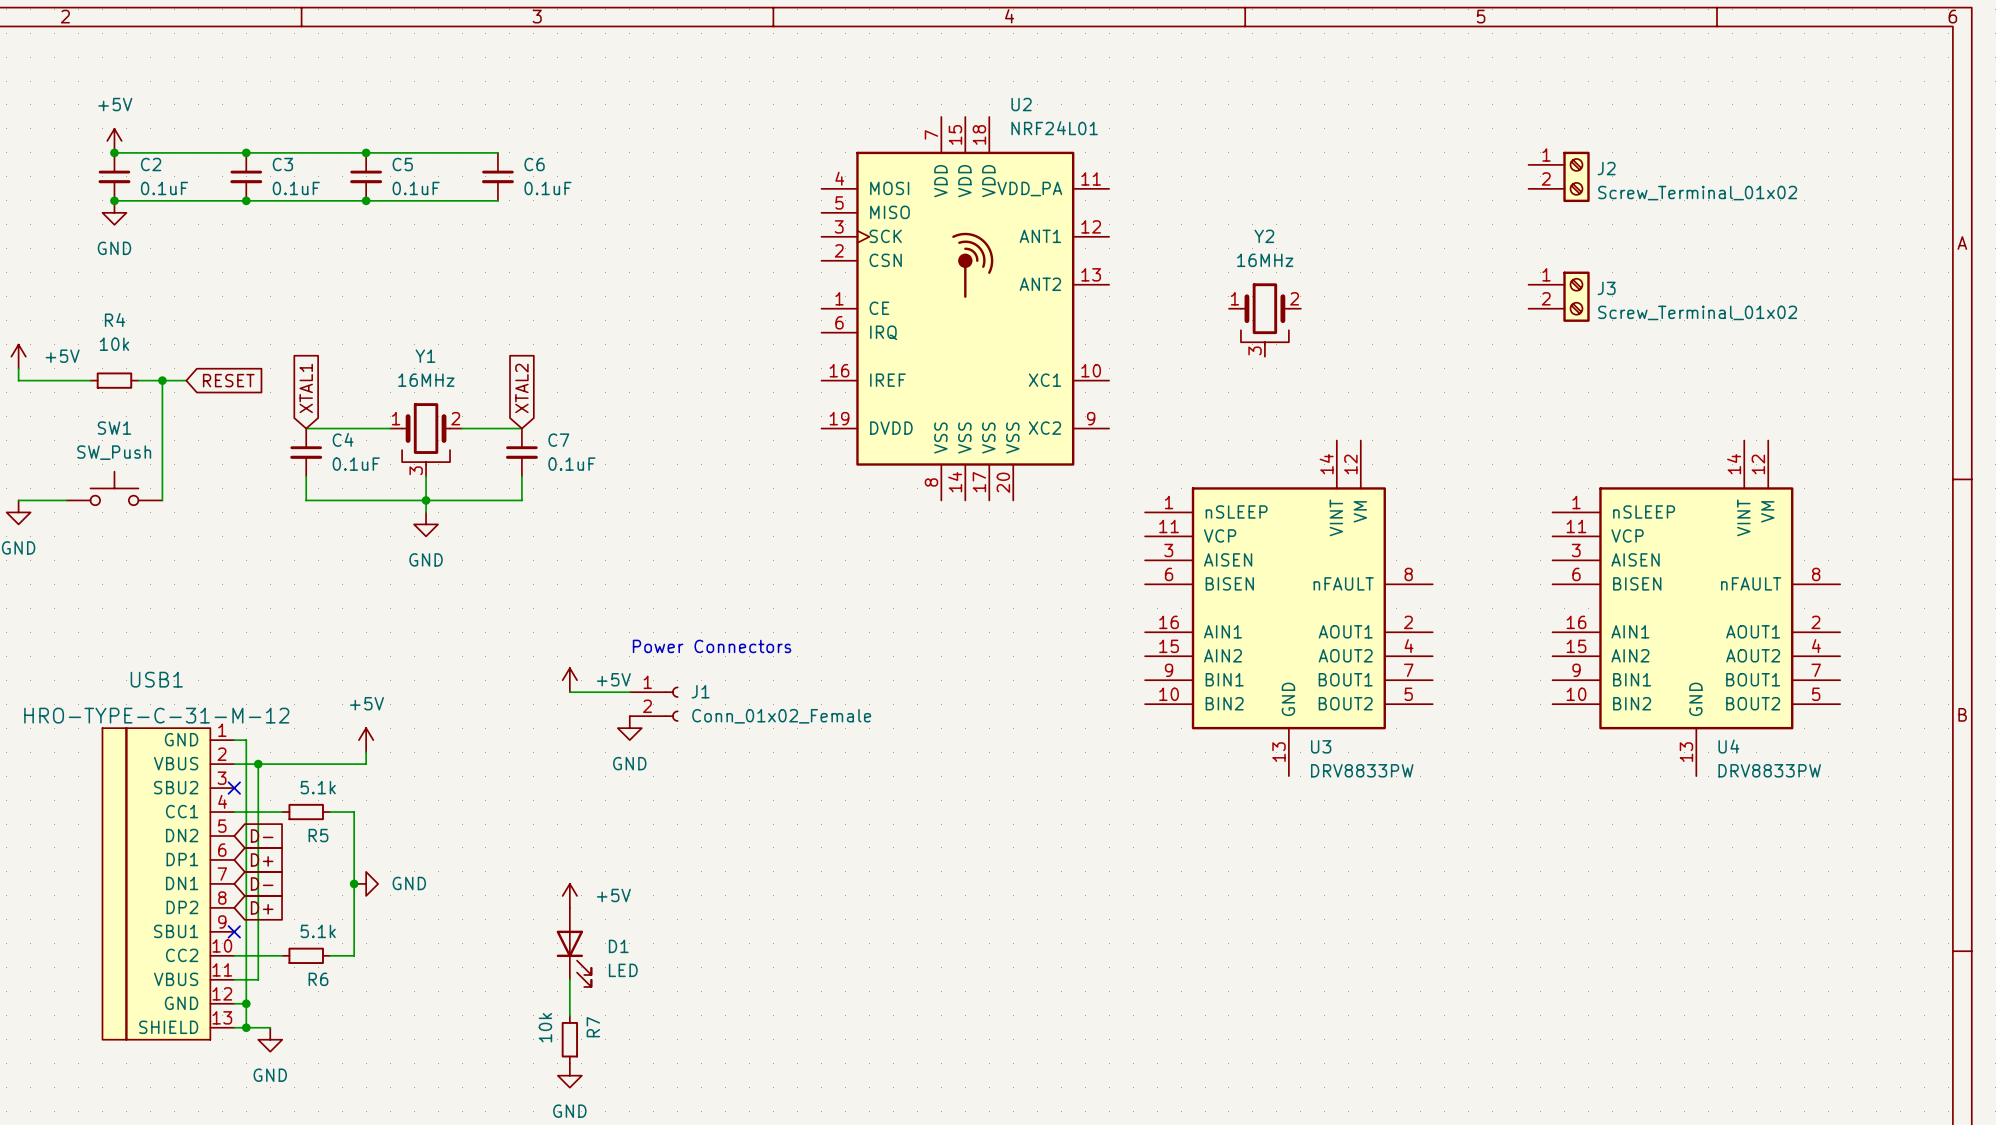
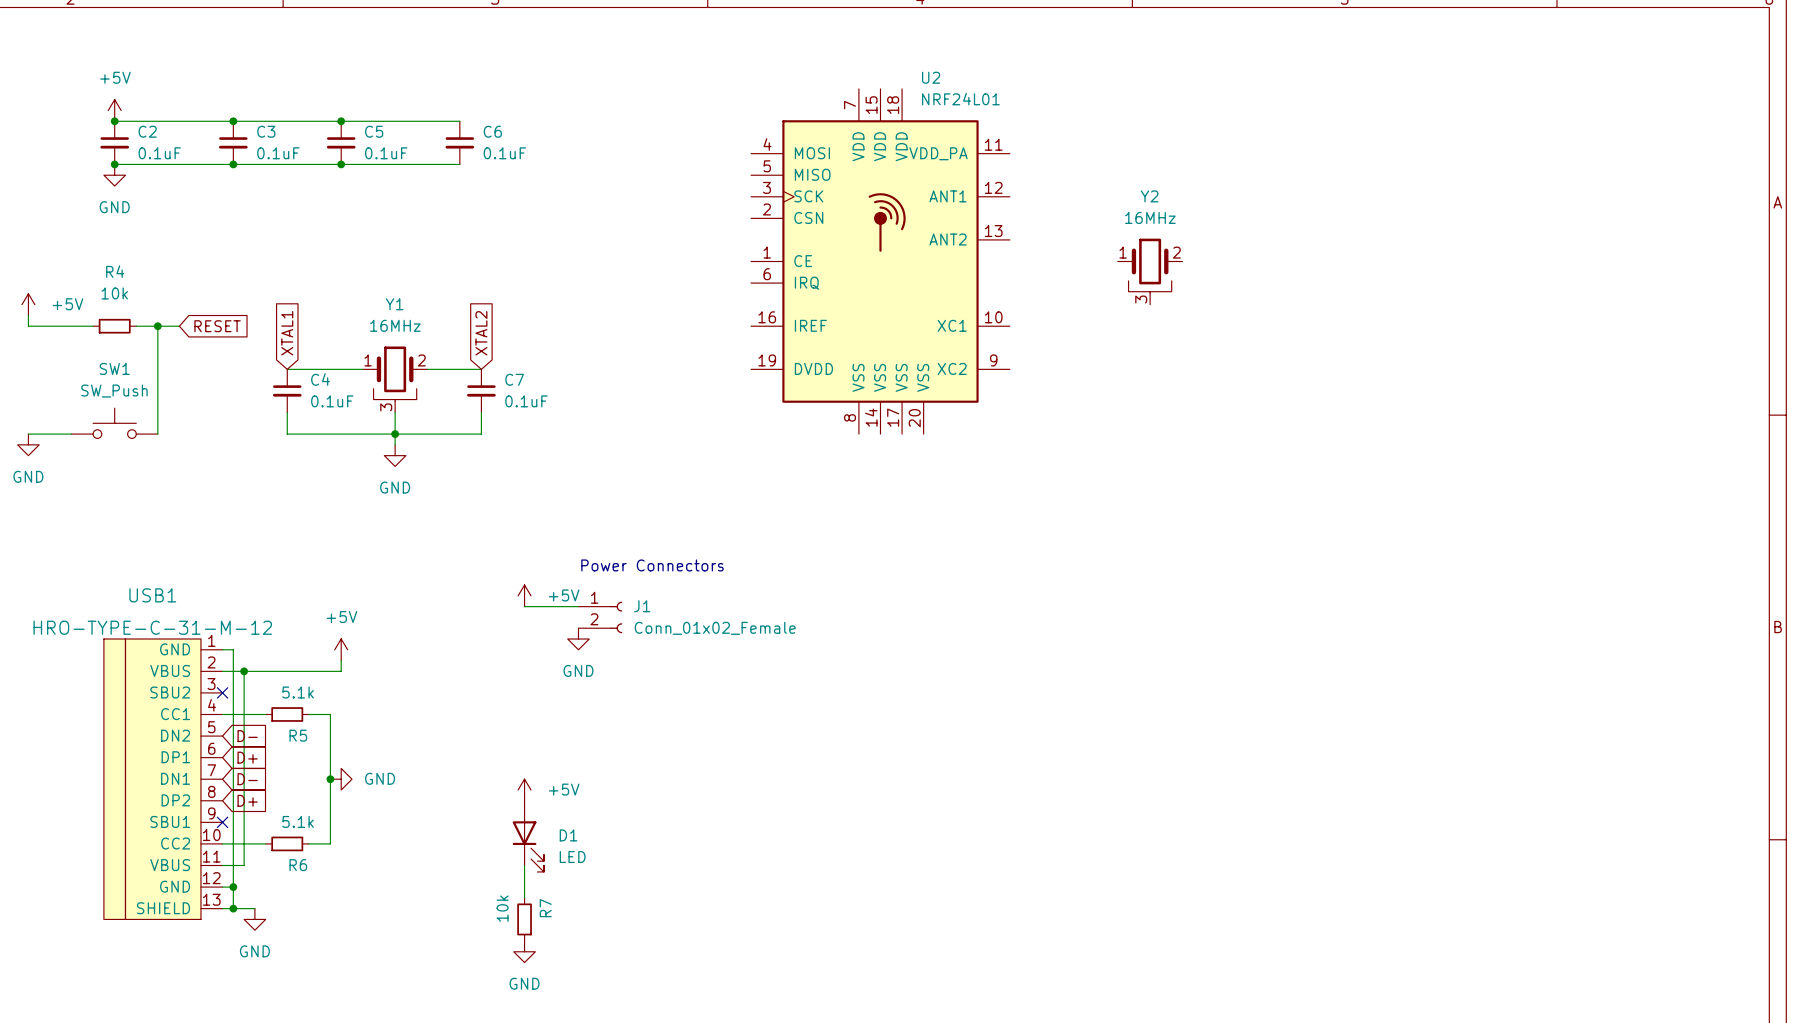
J2: Screw_Terminal_01x02 (1559, 176) -> none
J3: Screw_Terminal_01x02 (1559, 296) -> none
U3: DRV8833PW (1288, 608) -> none
U4: DRV8833PW (1696, 608) -> none

